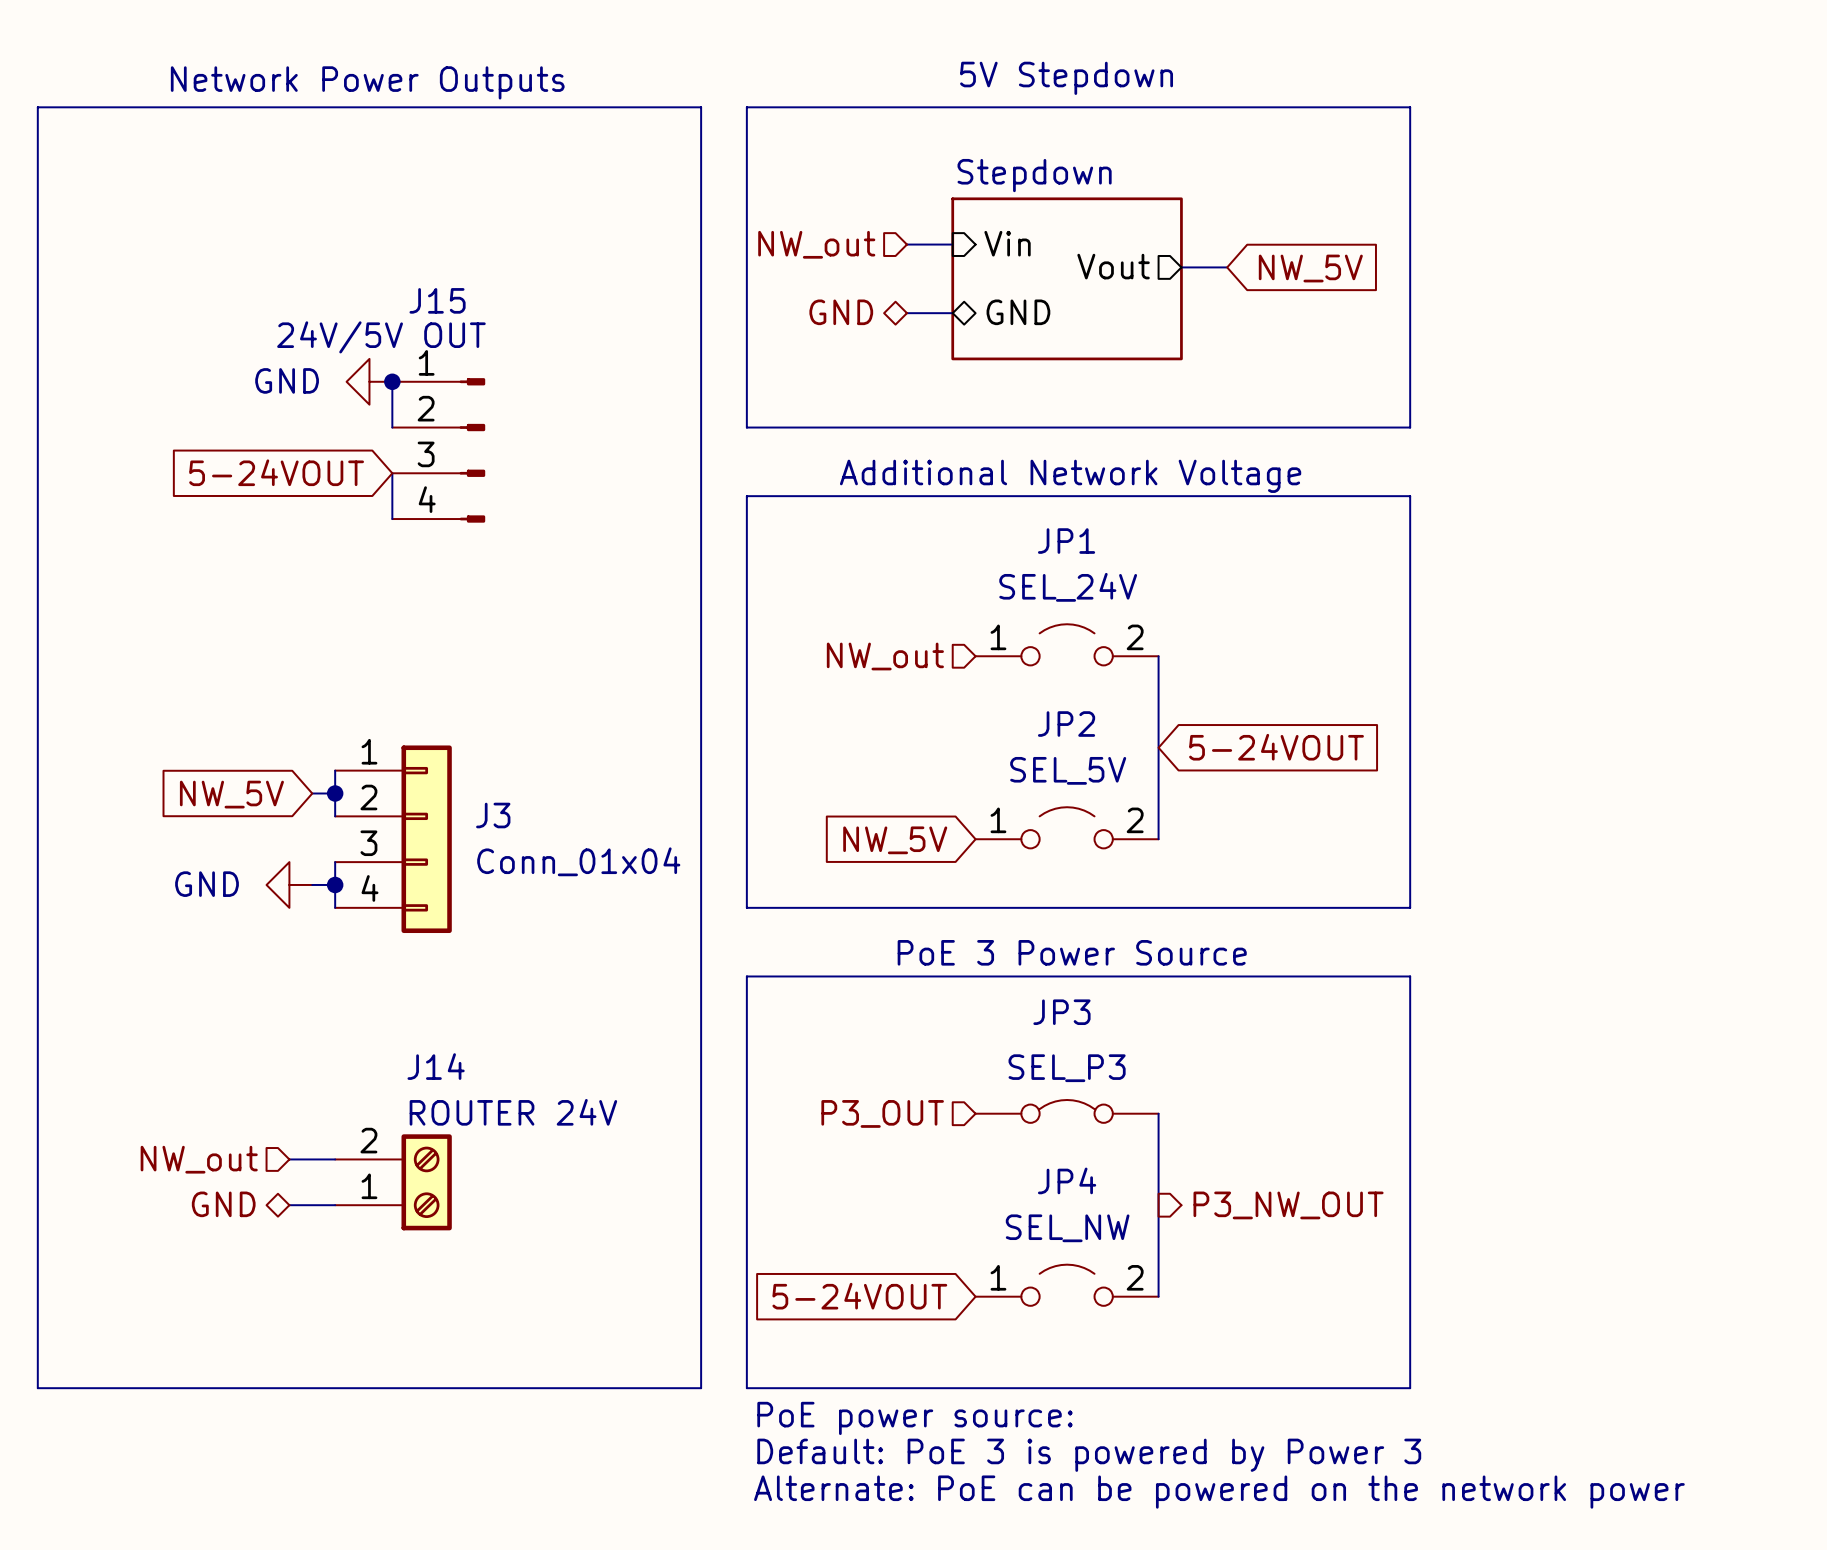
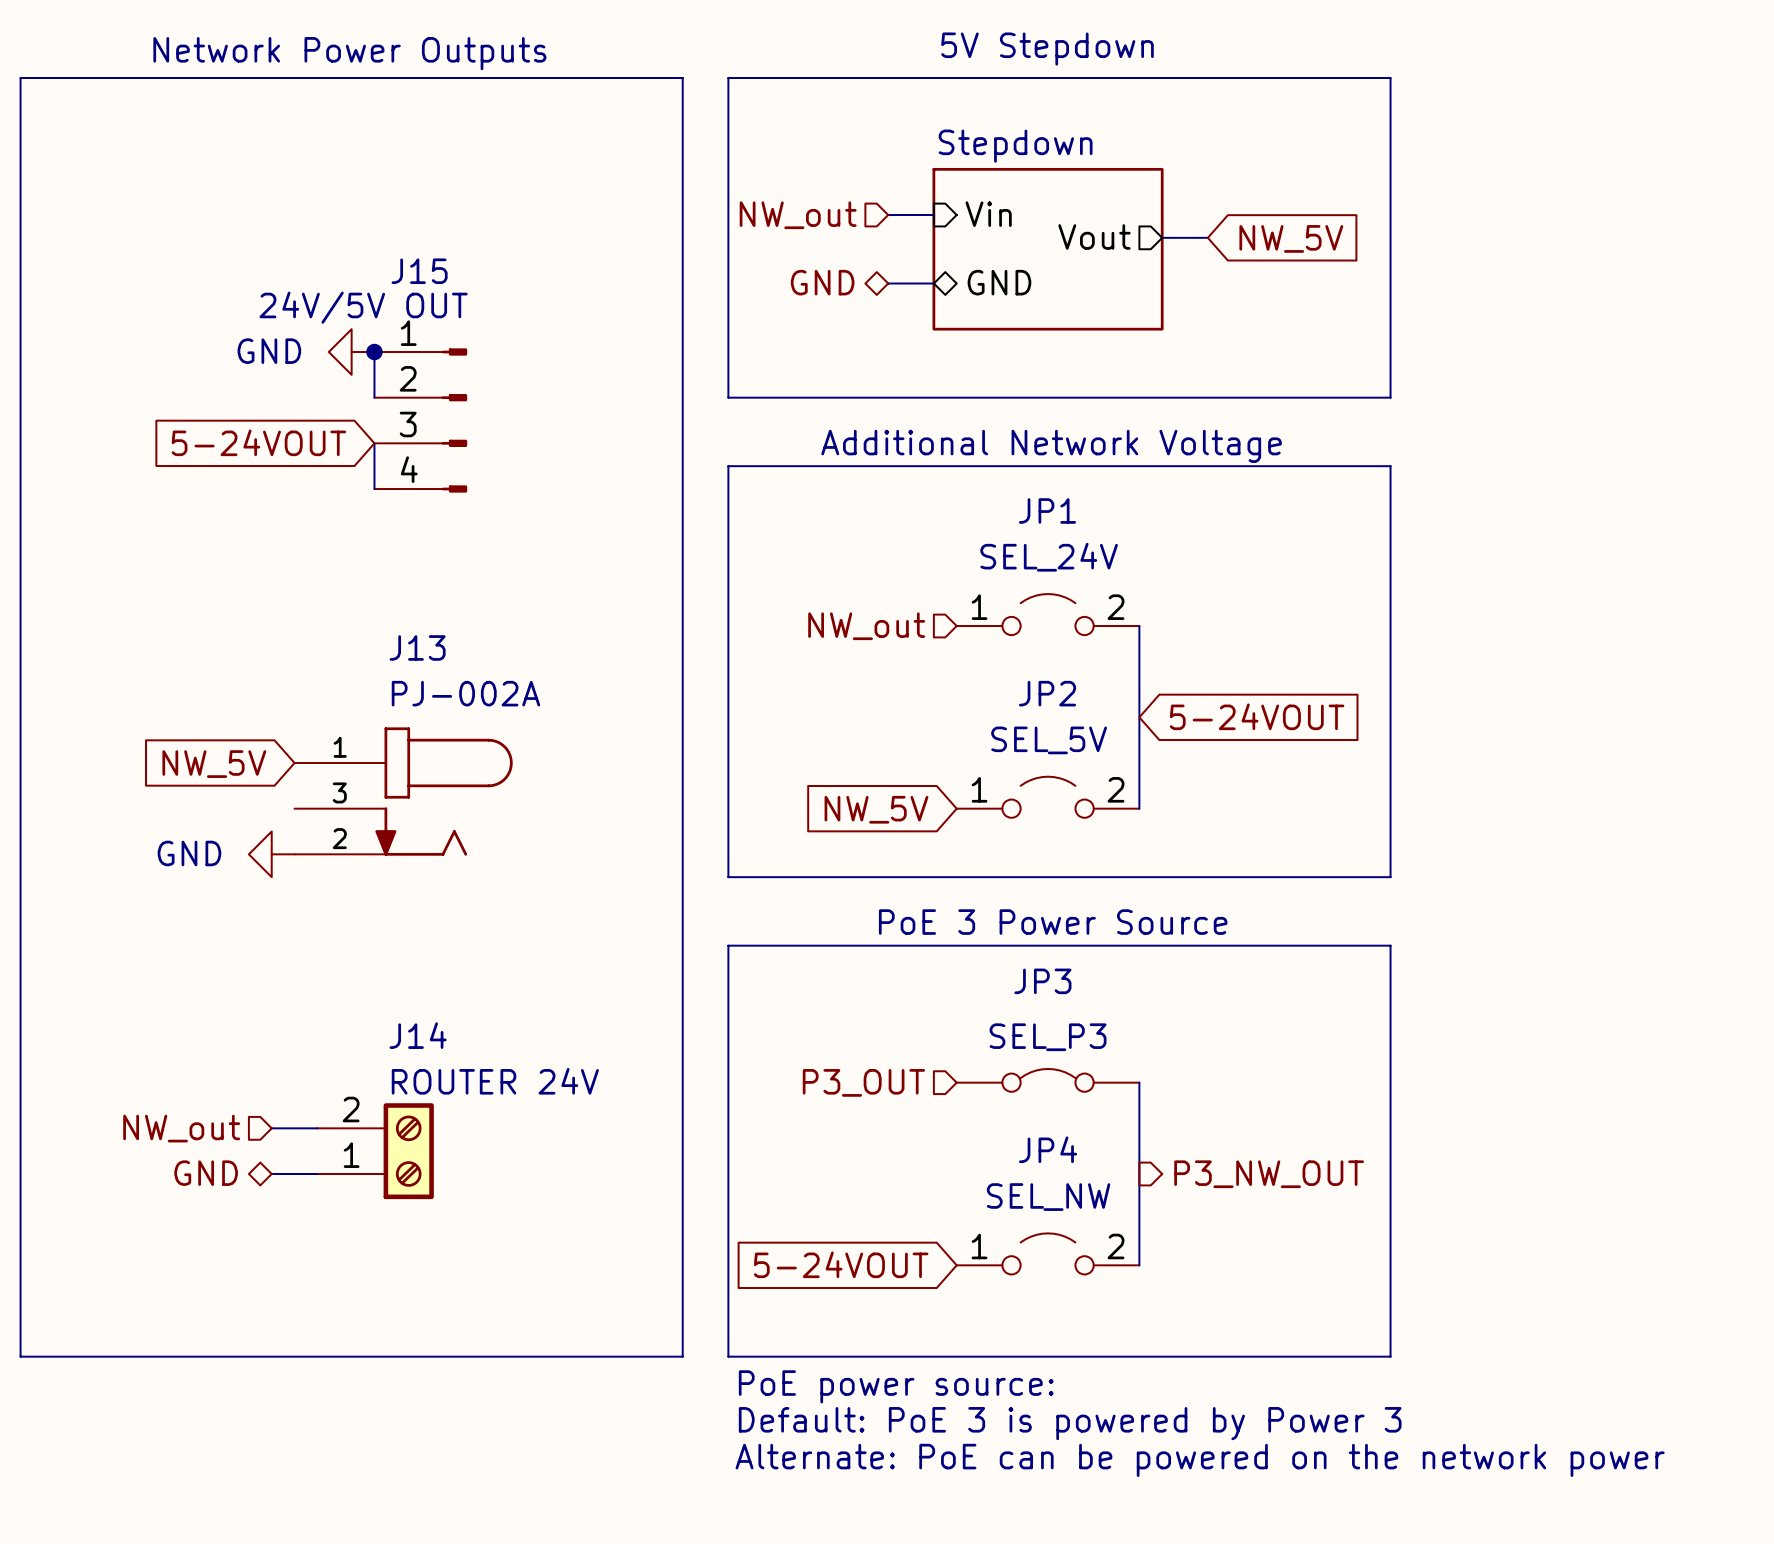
wire: (335, 770) (335, 816) -> none
junction: (335, 793) -> none
J13: none -> PJ-002A (403, 791)
J3: Conn_01x04 (393, 839) -> none
wire: (335, 862) (335, 907) -> none
junction: (335, 884) -> none

